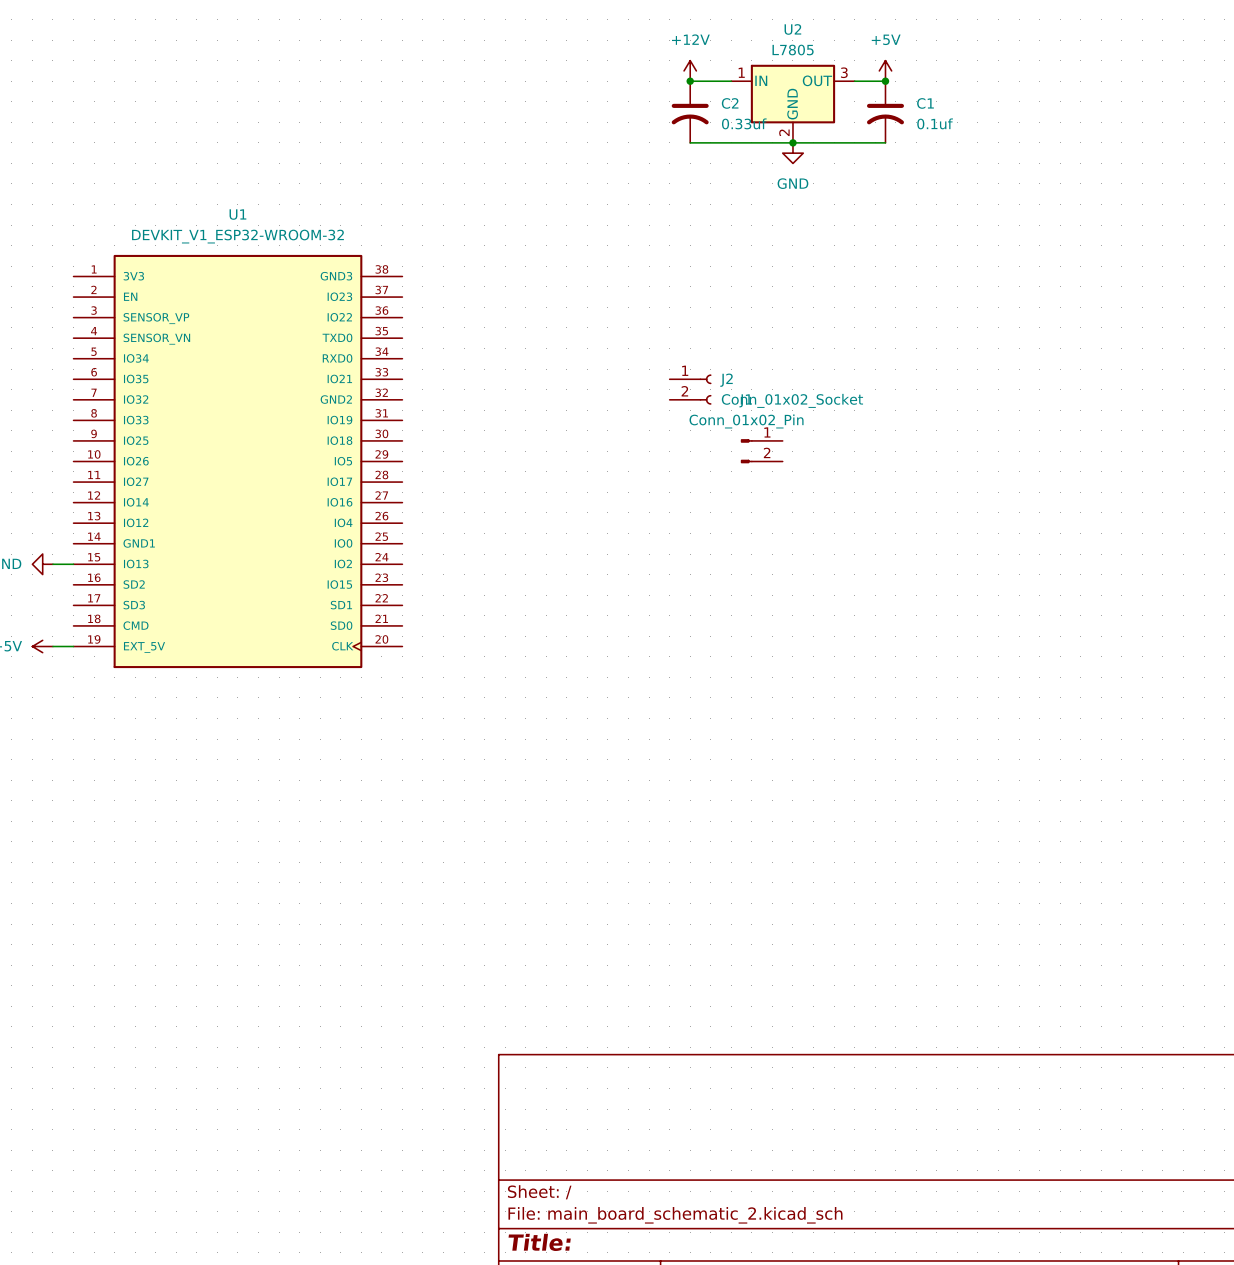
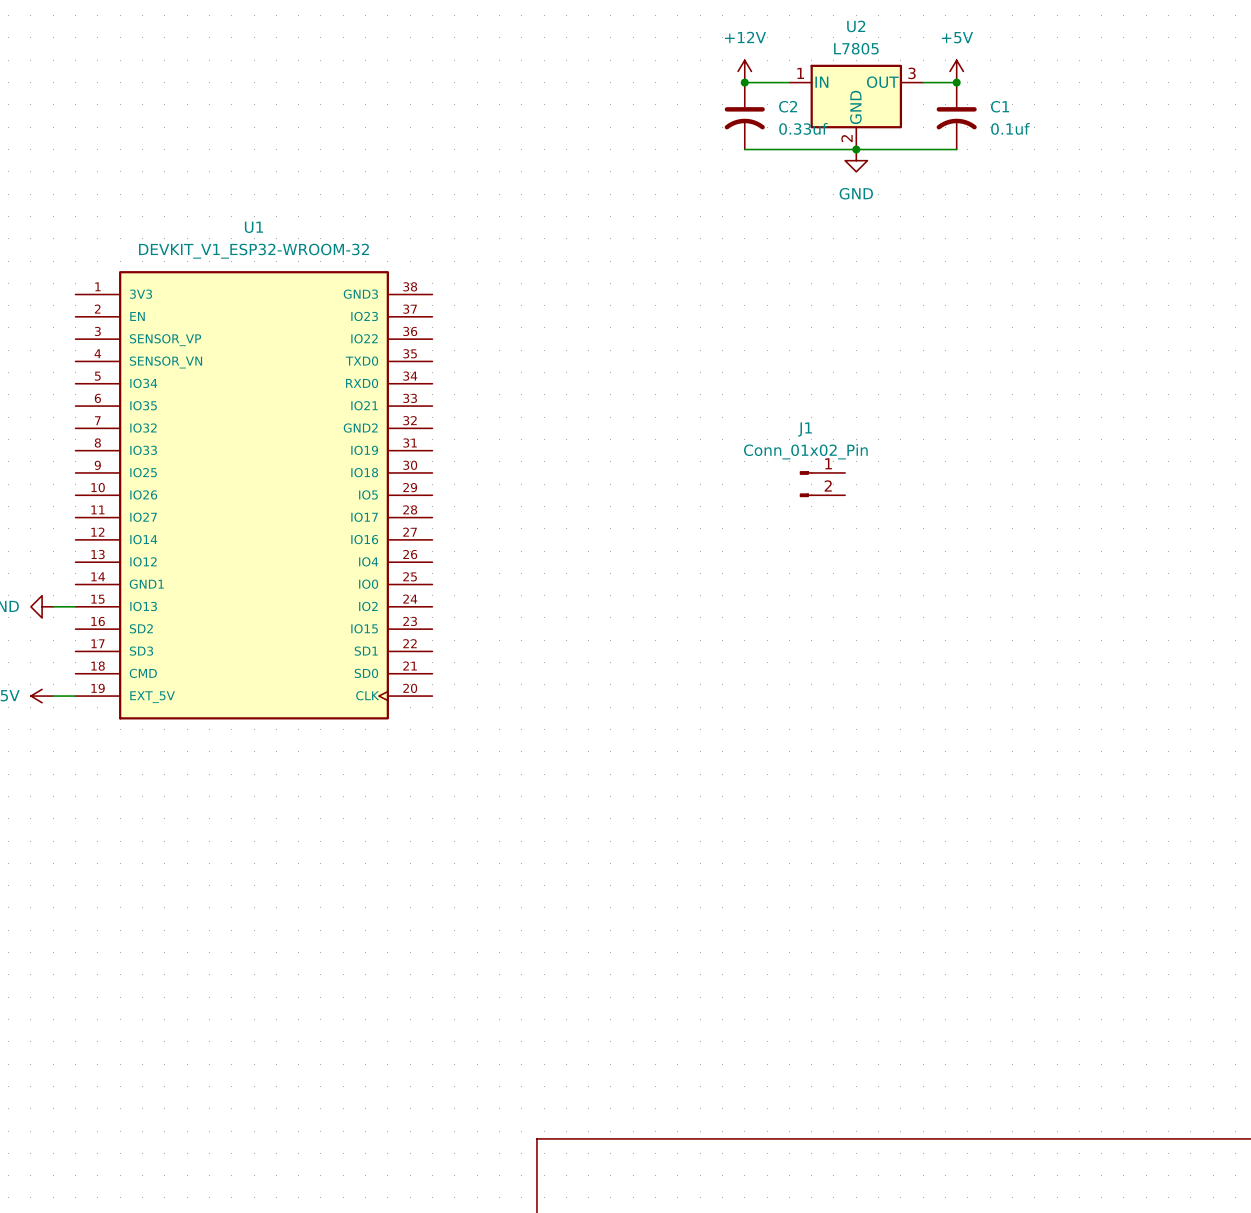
J2: Conn_01x02_Socket (690, 389) -> none

